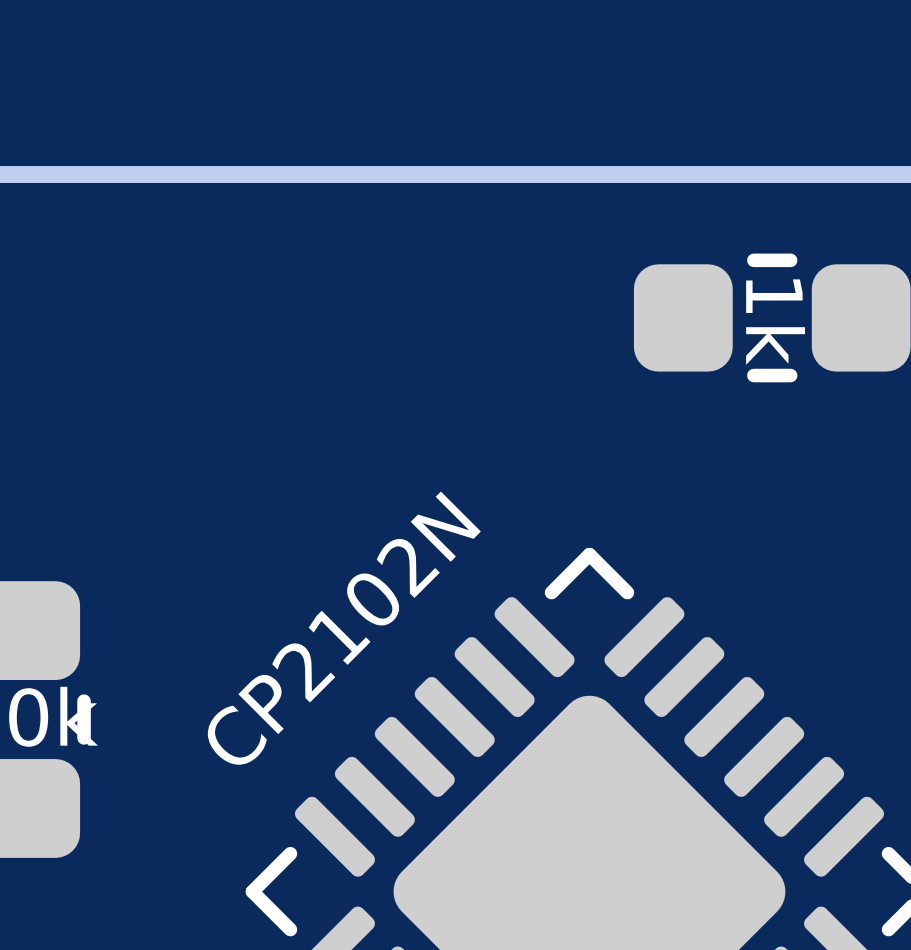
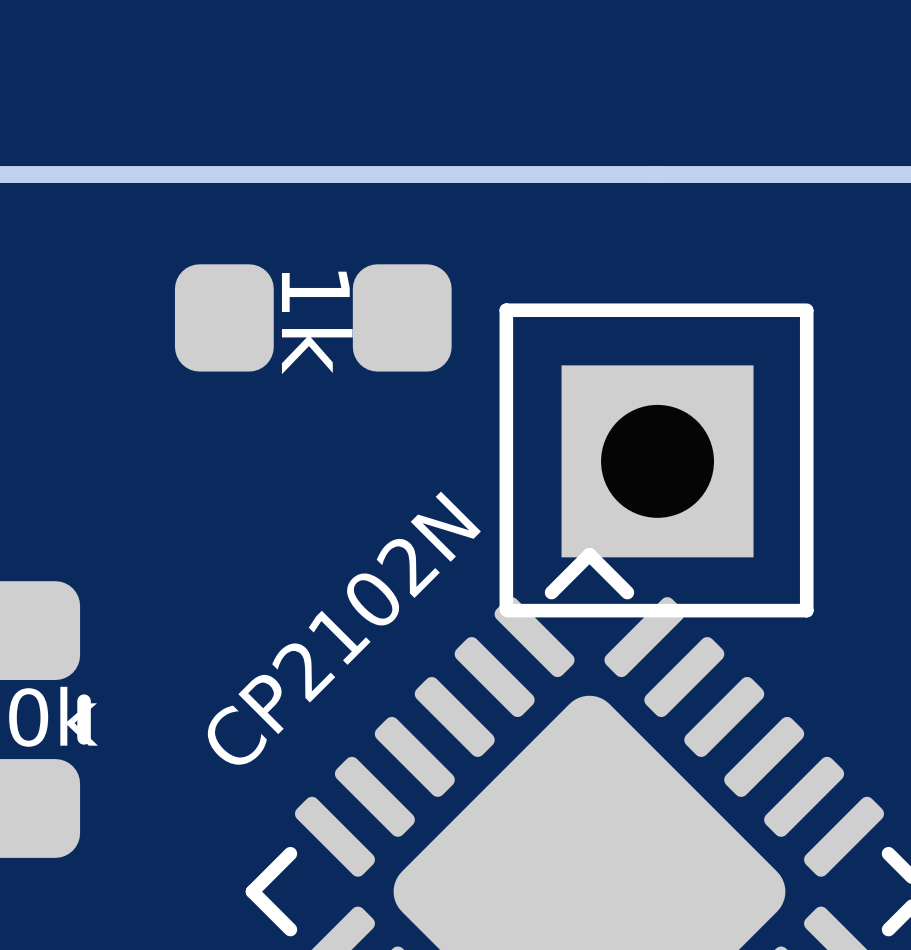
part: none -> 1k (313, 317)
part: 1k (772, 317) -> none
part: none -> (656, 460)

